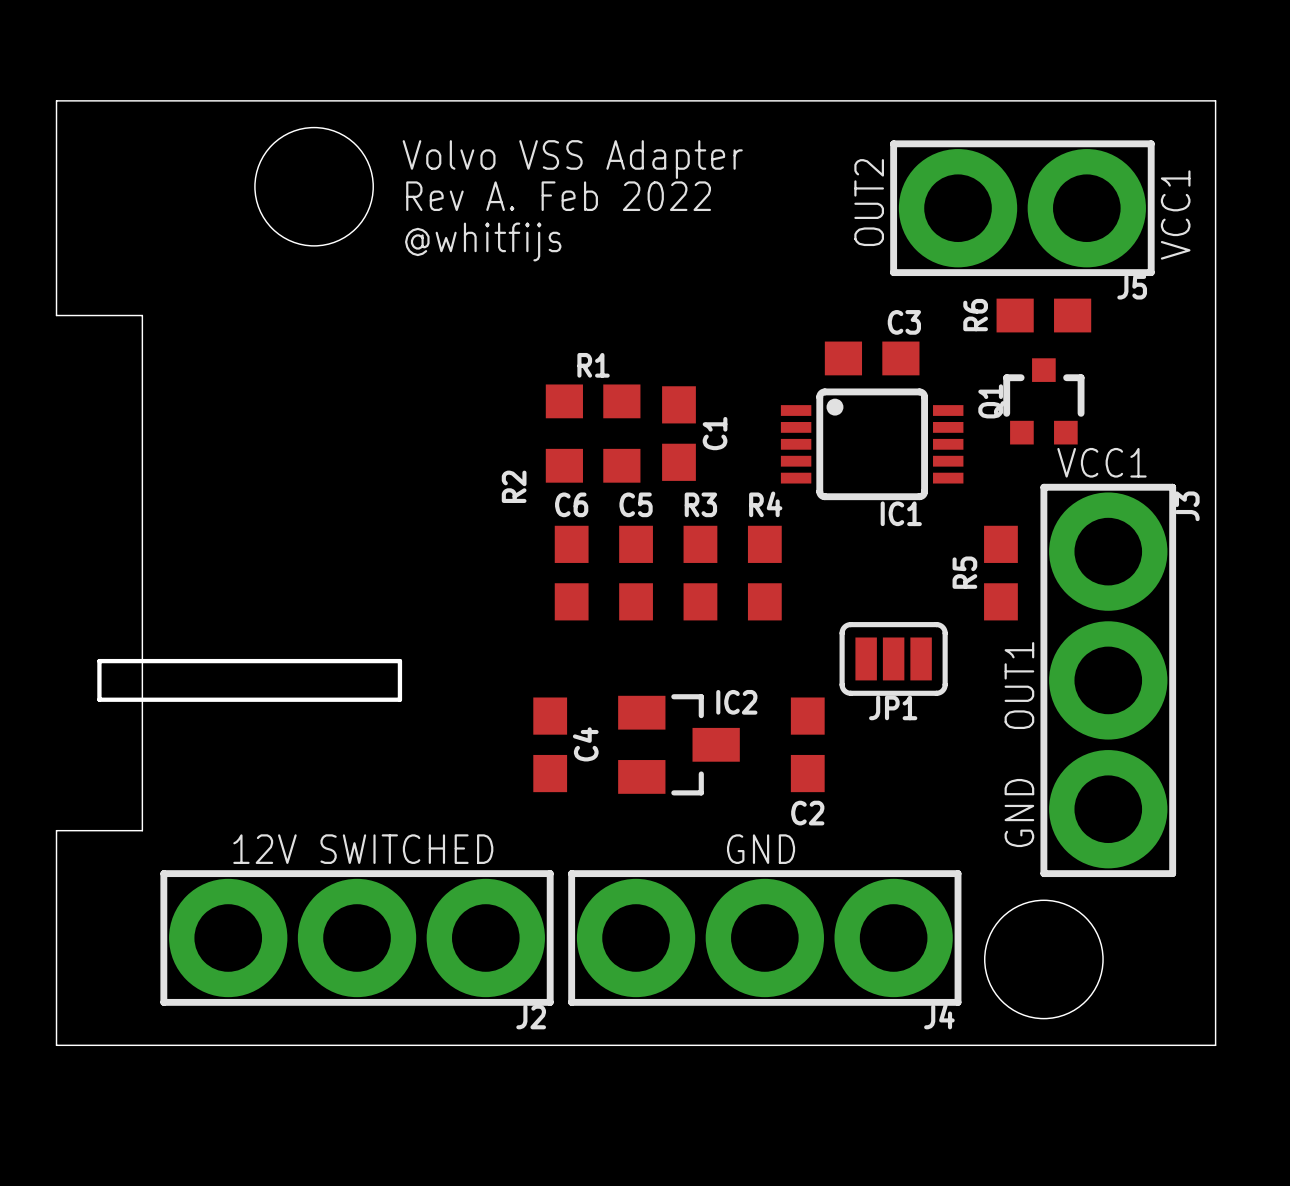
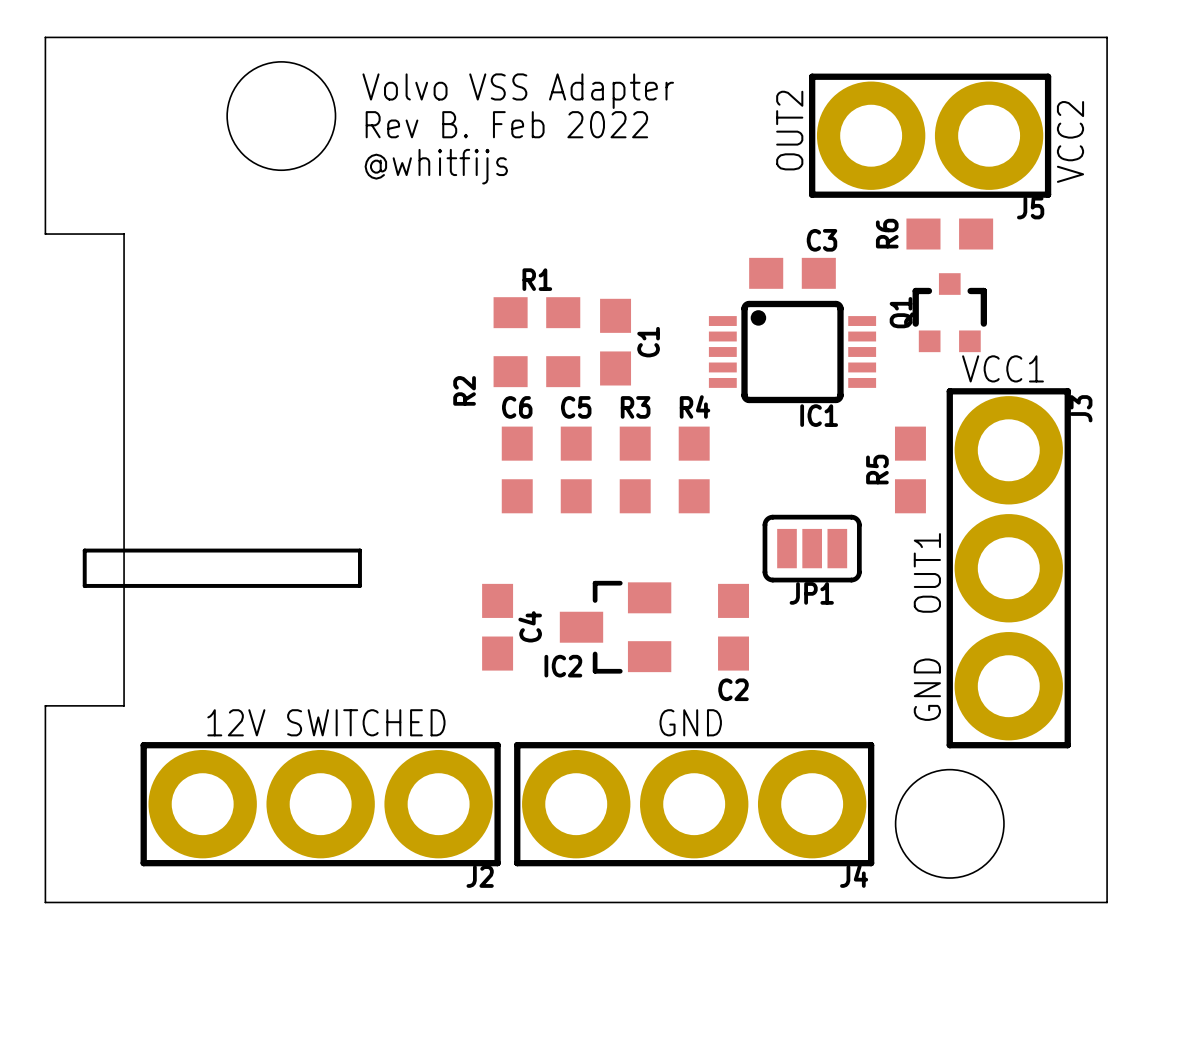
text: Rev A. Feb 2022 (558, 196) -> Rev B. Feb 2022 (506, 124)
text: VCC1 (1175, 214) -> VCC2 (1070, 141)
IC2 rotation: 0° (678, 744) -> 180° (615, 627)

